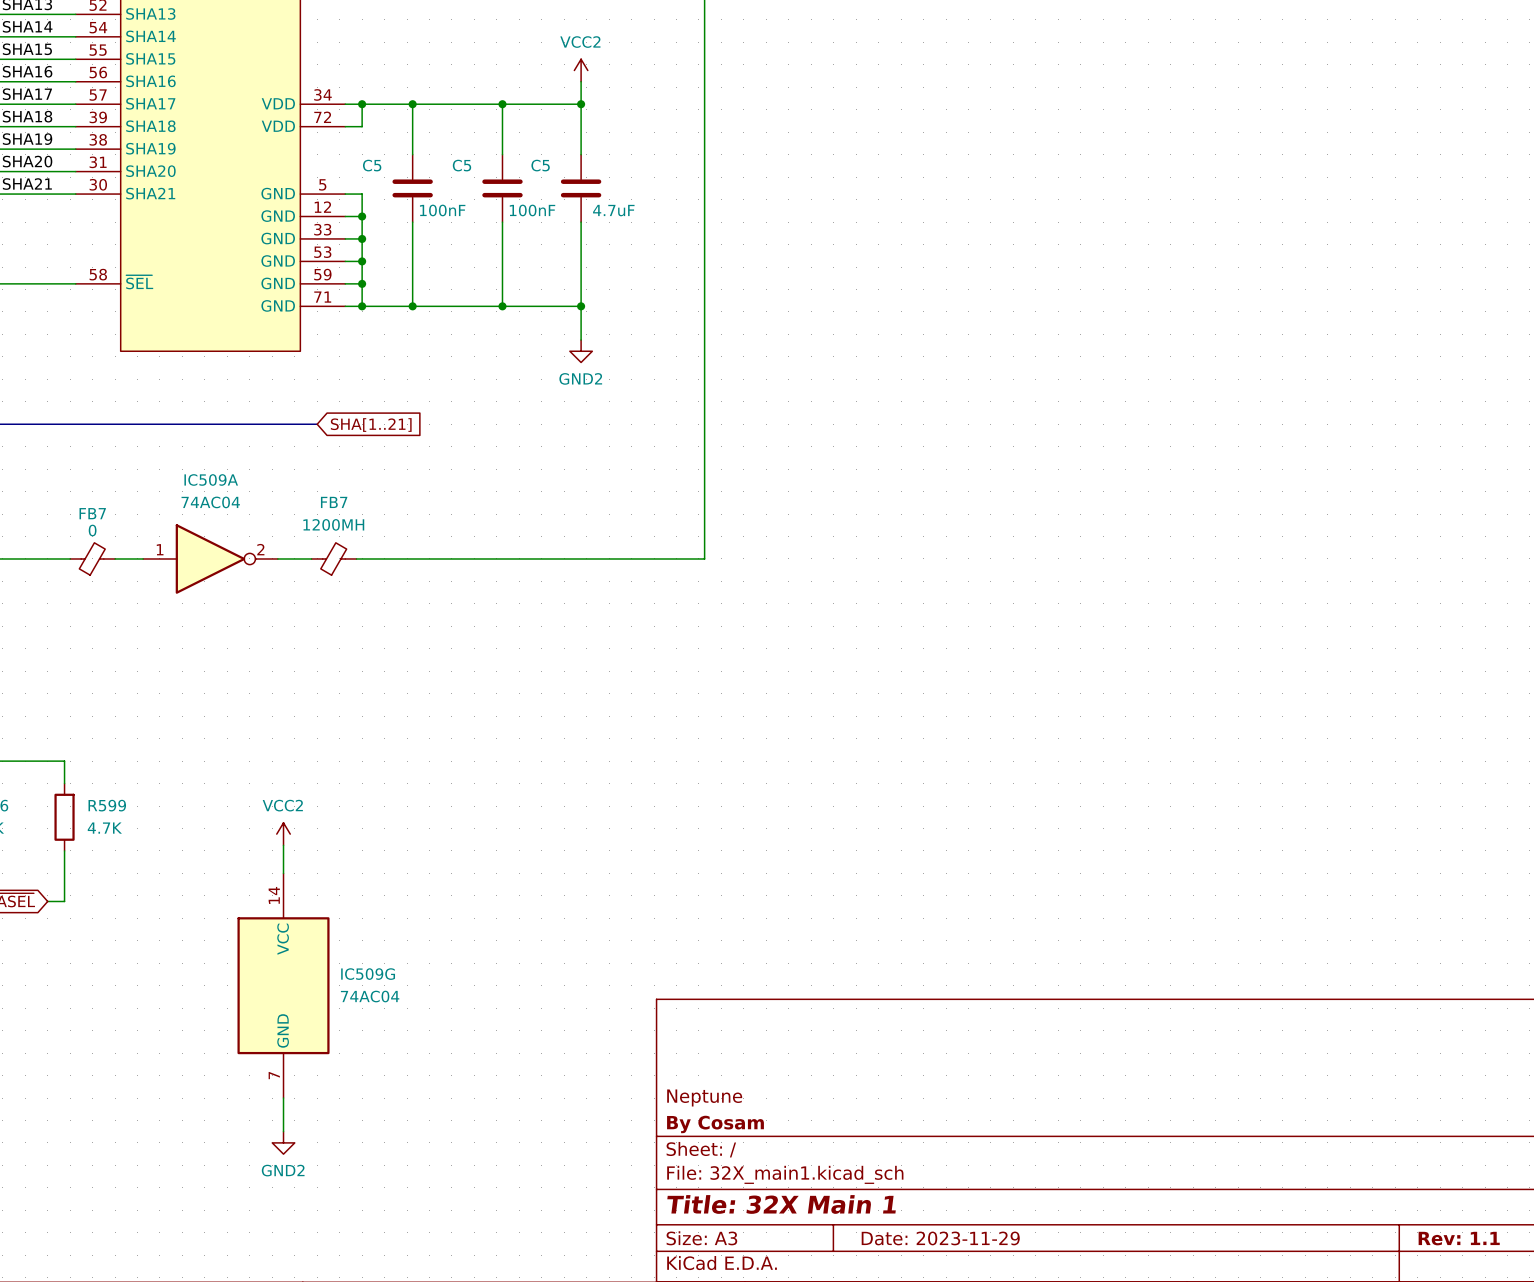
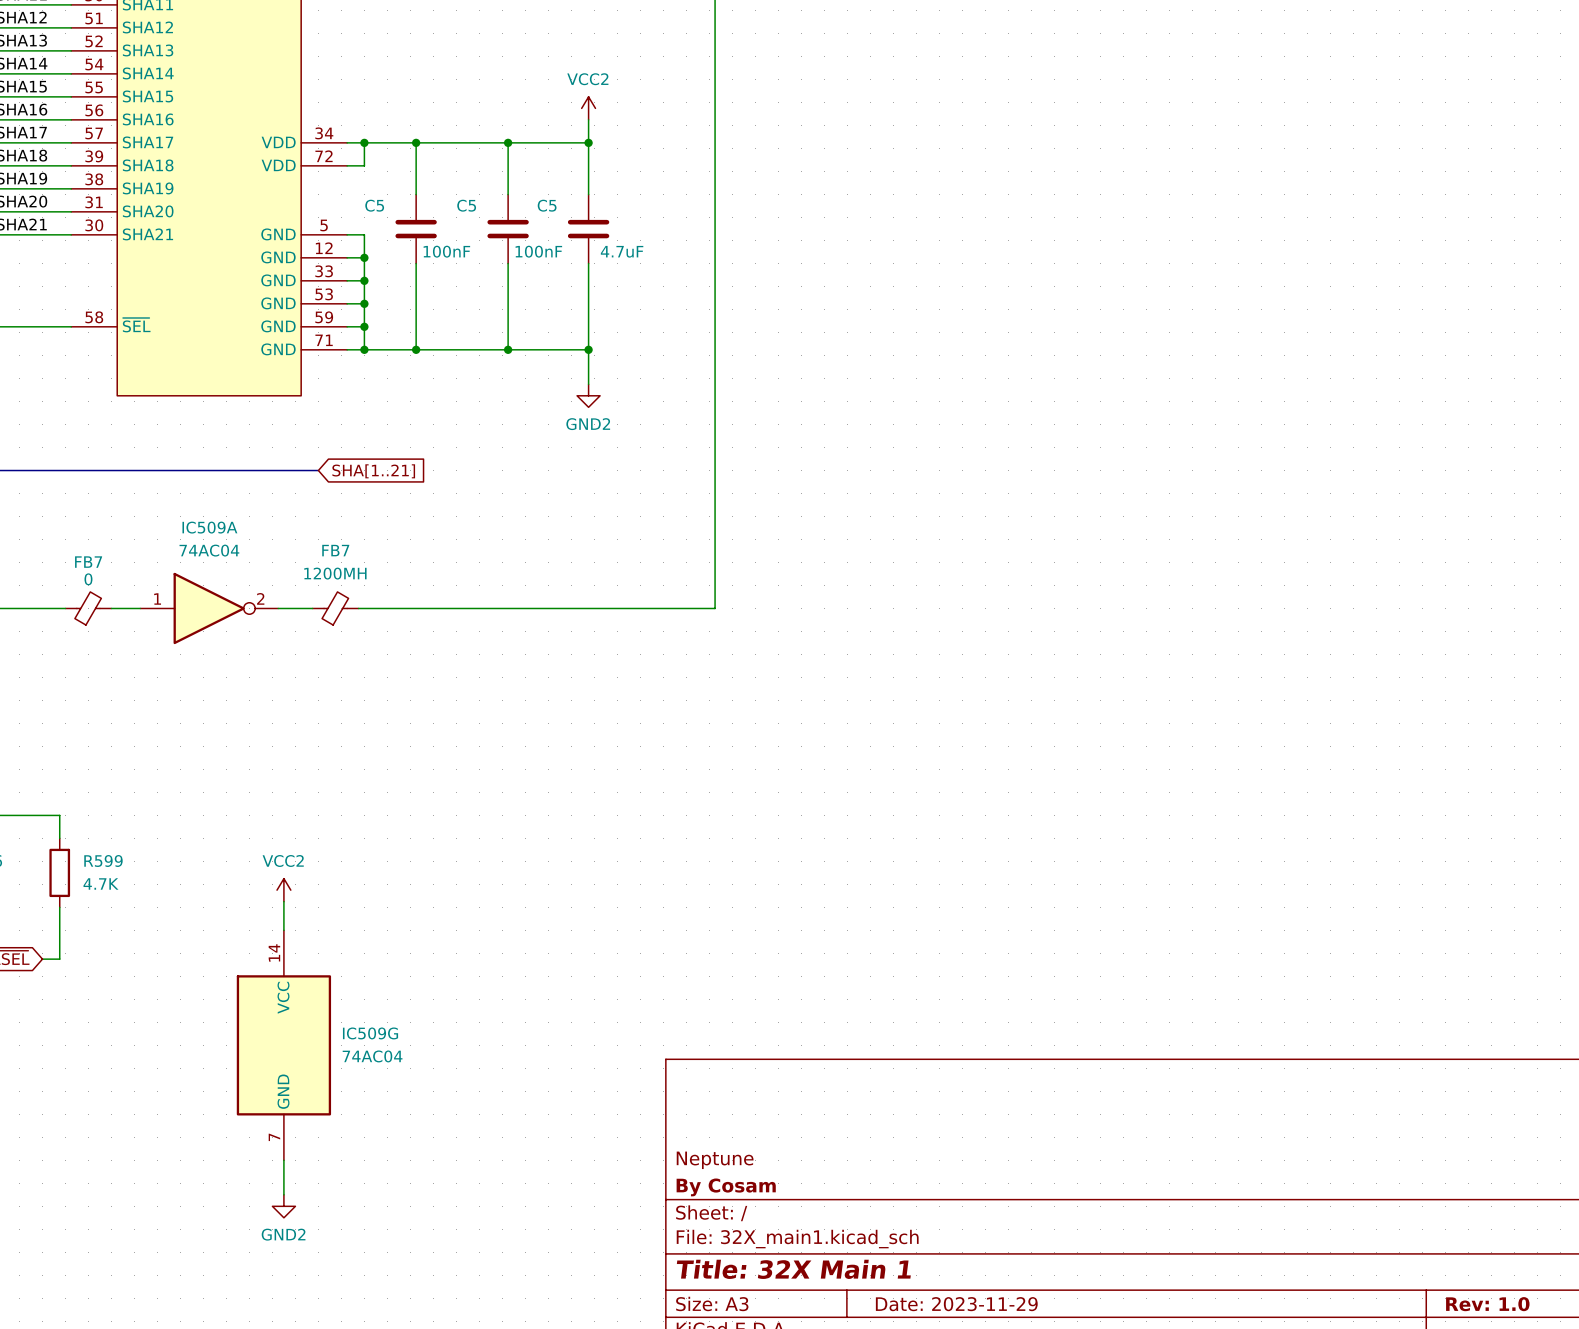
title block: Rev: 1.1 (1459, 1238) -> Rev: 1.0 (1487, 1304)

